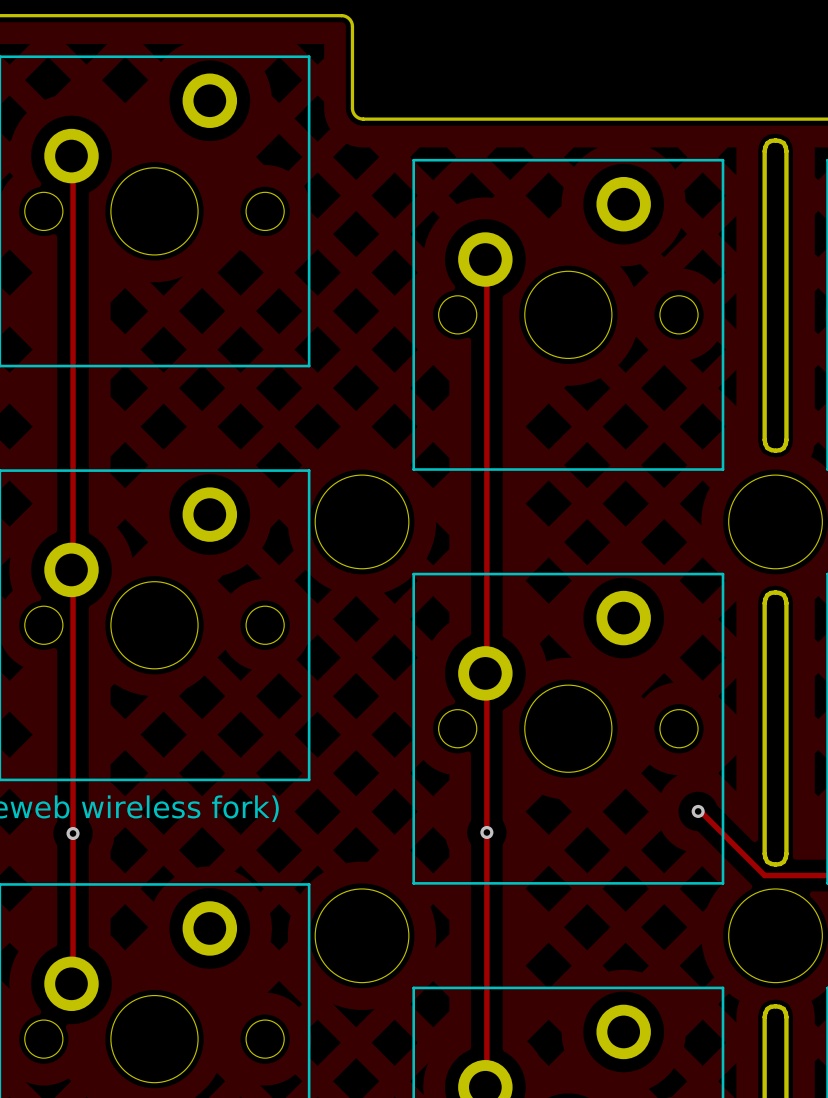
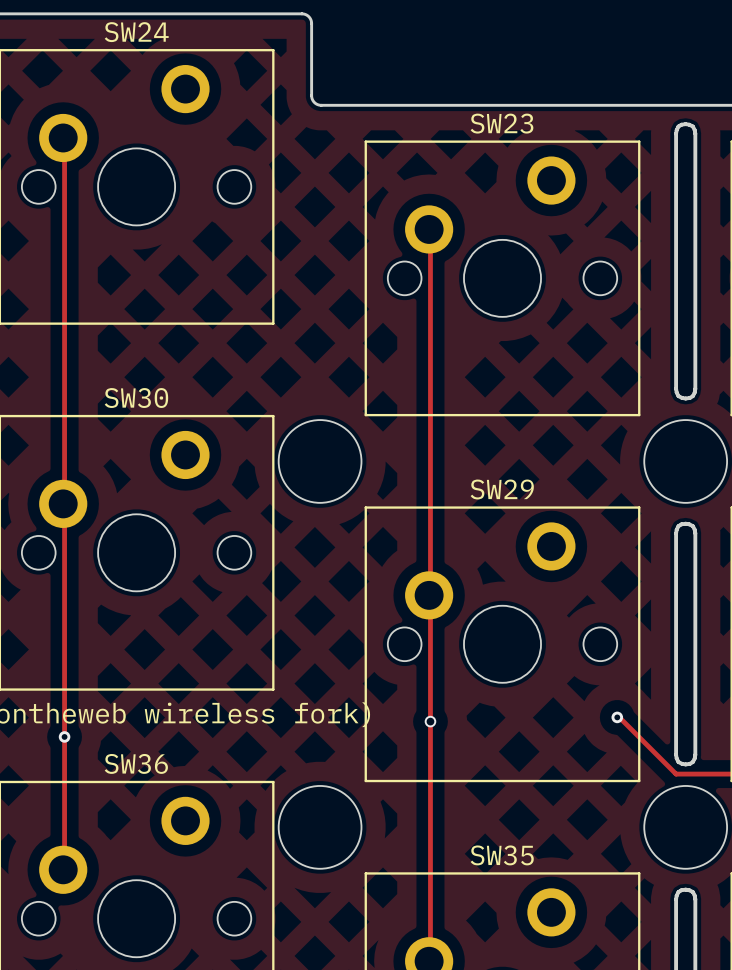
SW24 name: none -> SW24 (136, 32)
SW23 name: none -> SW23 (501, 123)
SW30 name: none -> SW30 (136, 398)
SW29 name: none -> SW29 (502, 489)
via: none -> (430, 721)
via: (486, 832) -> none
SW36 name: none -> SW36 (136, 763)
SW35 name: none -> SW35 (502, 855)

